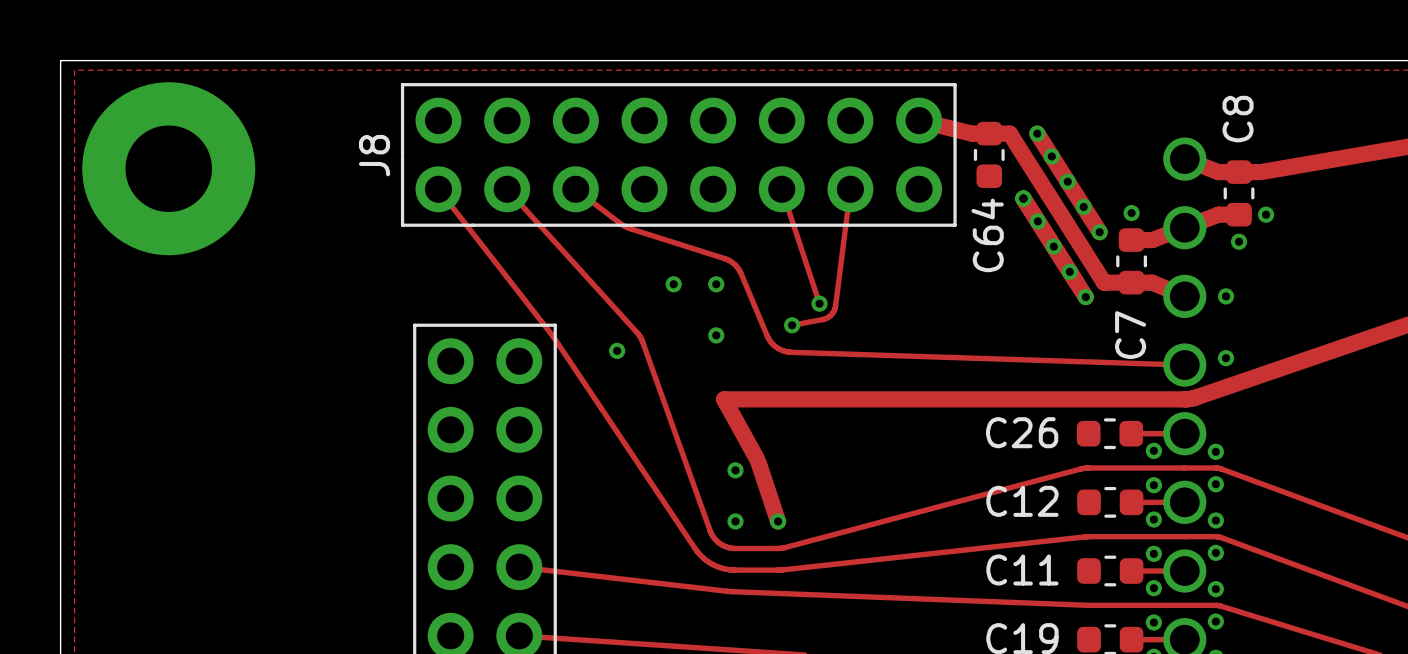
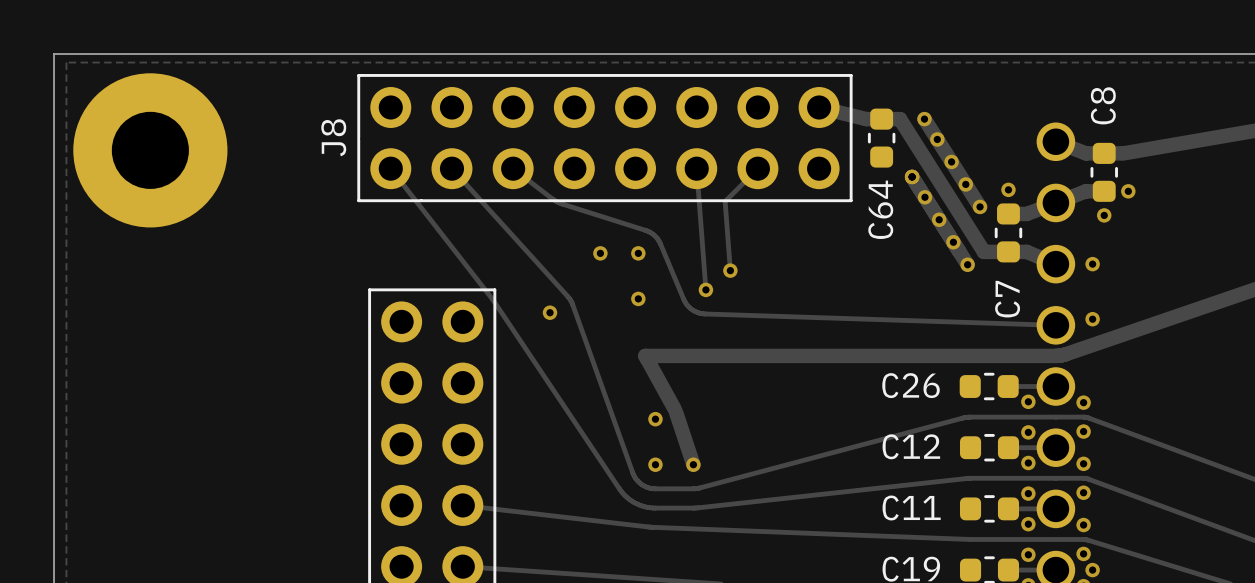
track: (781, 189) (819, 303) -> (696, 168) (705, 289)
track: (850, 189) (834, 309) (826, 318) (792, 325) -> (757, 168) (725, 201) (730, 270)
via: none -> (1092, 570)

